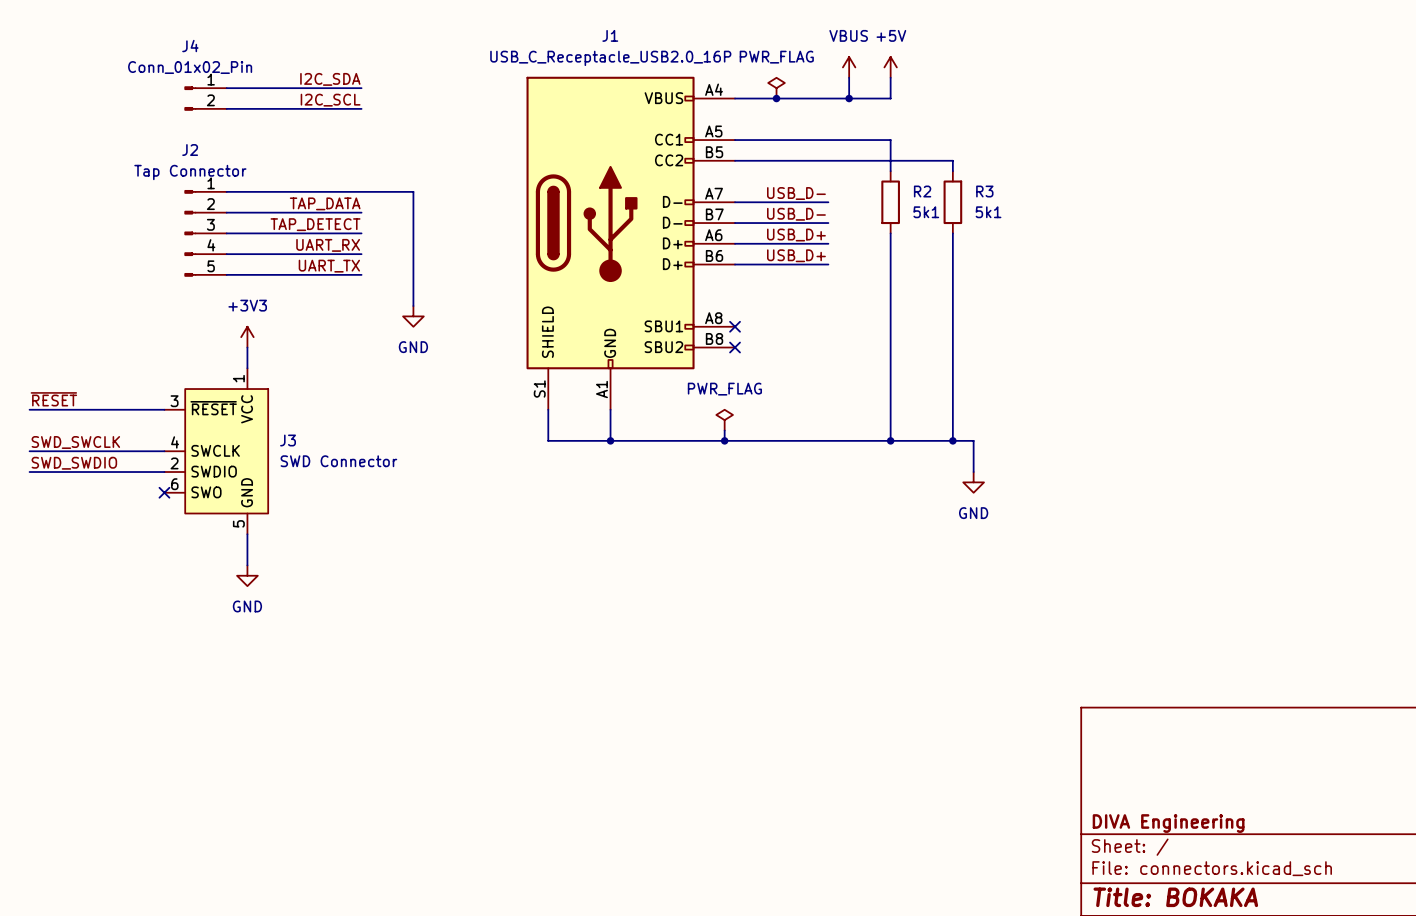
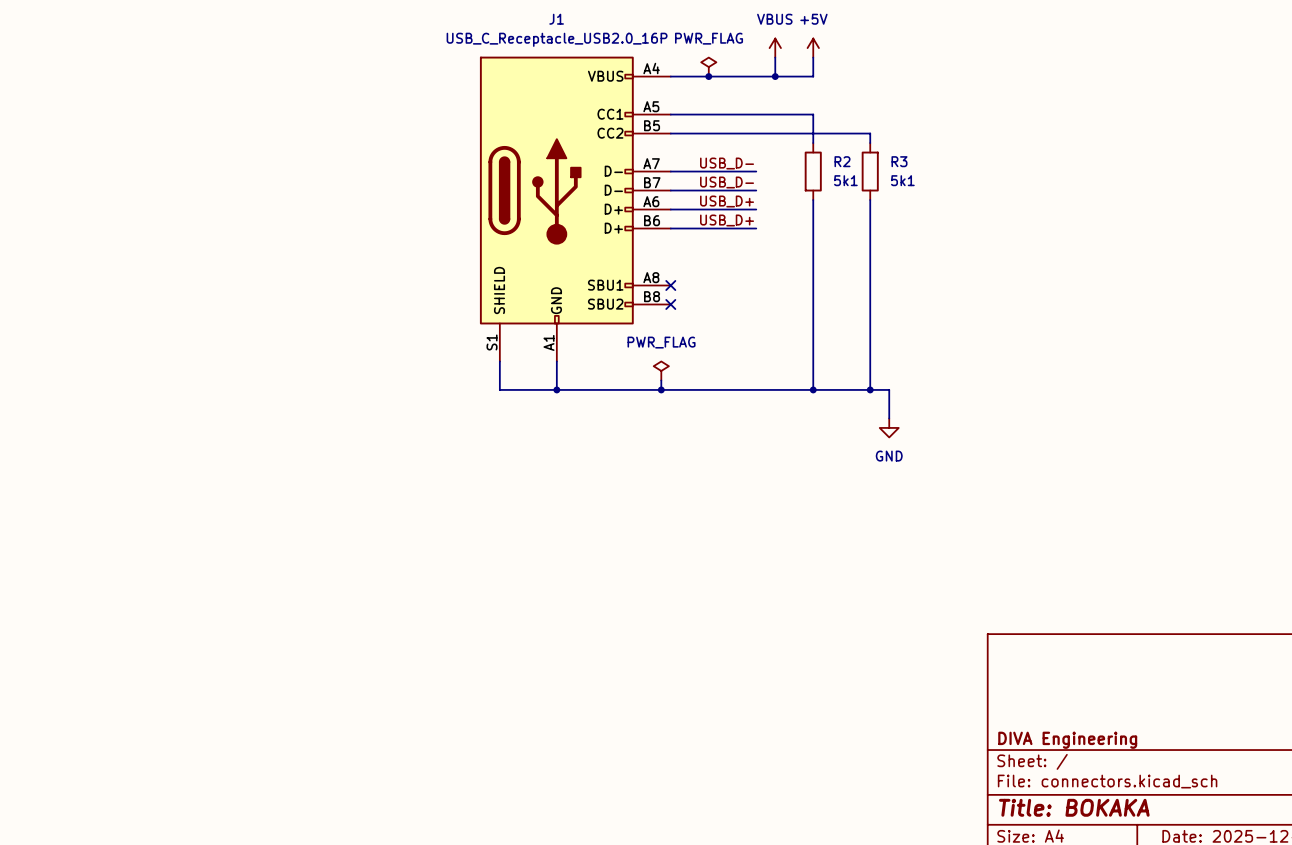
label: I2C_SDA (330, 79) -> none
wire: (226, 88) (361, 88) -> none
J4: Conn_01x02_Pin (205, 98) -> none
label: I2C_SCL (330, 100) -> none
wire: (226, 108) (361, 108) -> none
wire: (226, 191) (413, 191) (413, 306) -> none
label: TAP_DATA (325, 203) -> none
wire: (226, 212) (361, 212) -> none
label: TAP_DETECT (315, 224) -> none
J2: Tap Connector (205, 233) -> none
wire: (226, 233) (361, 233) -> none
label: UART_RX (328, 245) -> none
wire: (226, 254) (361, 254) -> none
label: UART_TX (329, 266) -> none
wire: (226, 274) (361, 274) -> none
power symbol: GND (413, 316) -> none
power symbol: +3V3 (247, 337) -> none
wire: (247, 347) (247, 368) -> none
label: ~{RESET} (53, 399) -> none
wire: (29, 409) (164, 409) -> none
label: SWD_SWCLK (75, 442) -> none
wire: (29, 451) (164, 451) -> none
J3: SWD Connector (216, 451) -> none
label: SWD_SWDIO (74, 463) -> none
wire: (29, 472) (164, 472) -> none
no-connect mark: (164, 492) -> none
wire: (247, 534) (247, 565) -> none
power symbol: GND (247, 575) -> none

